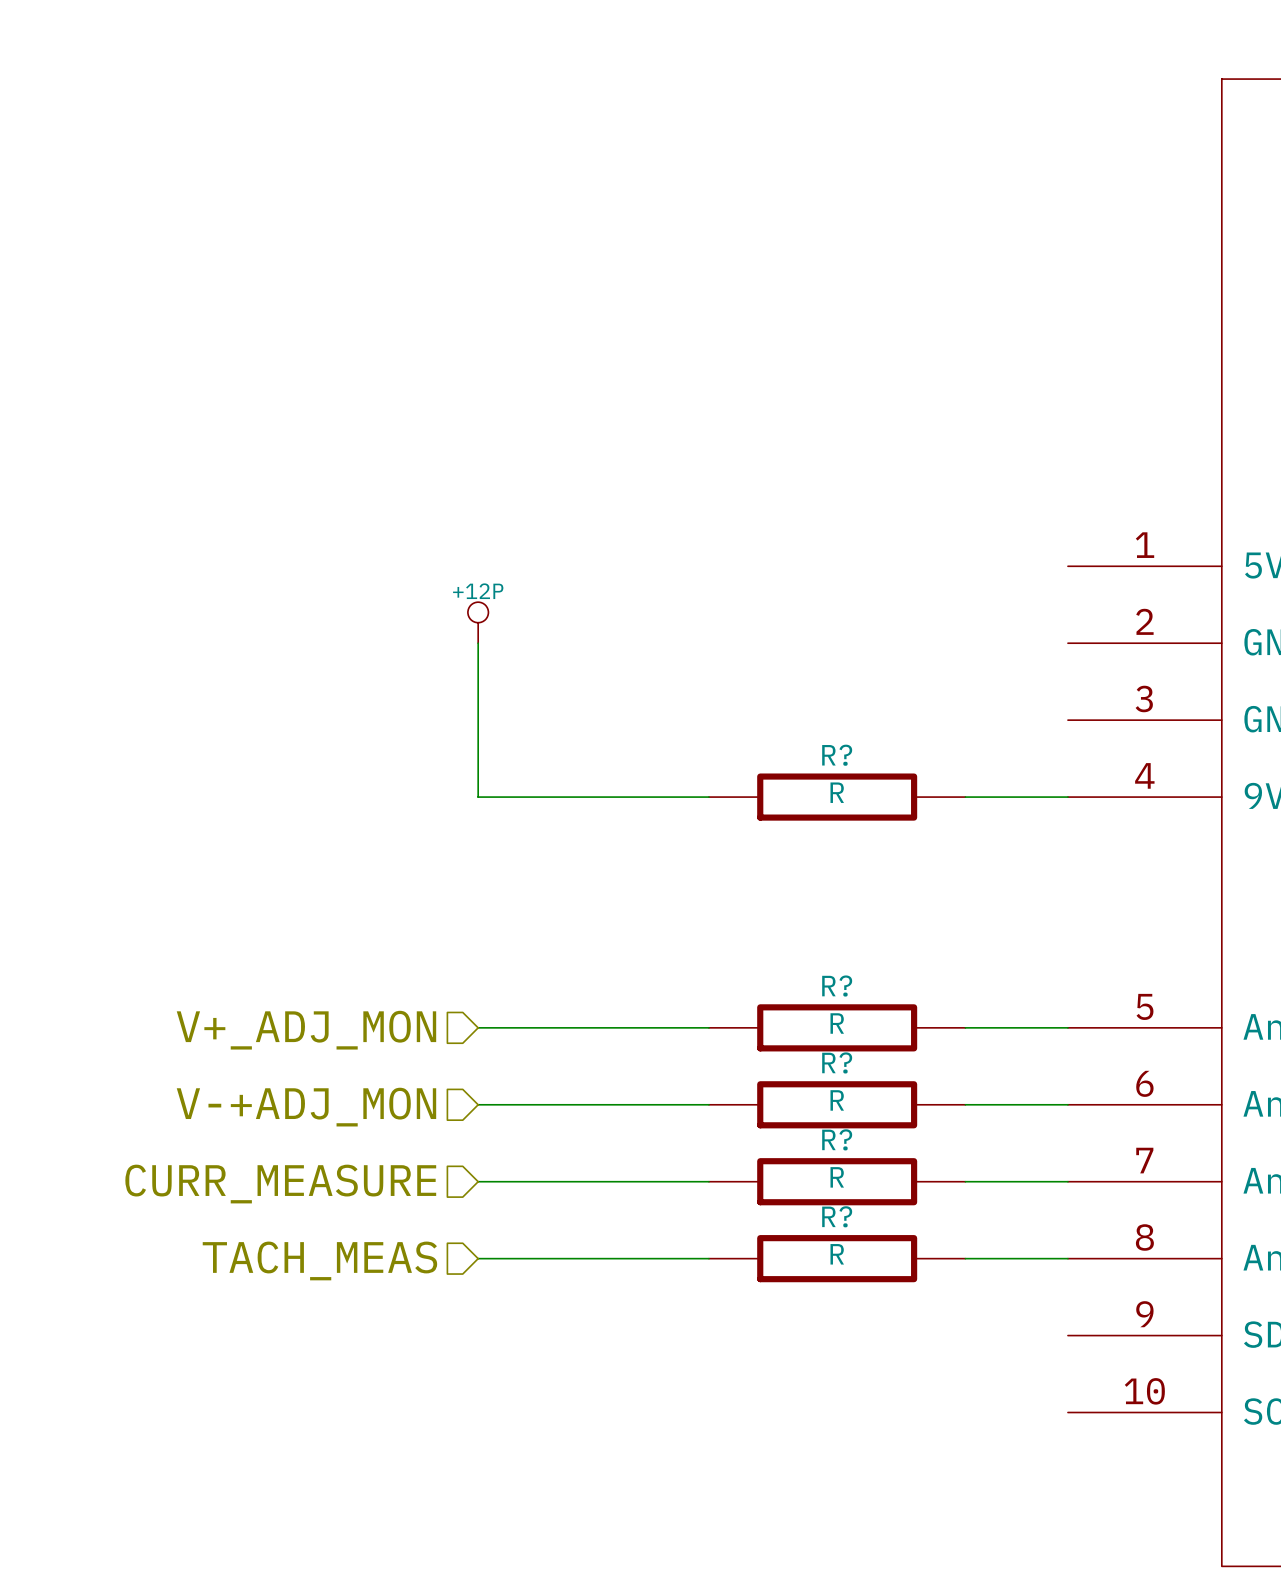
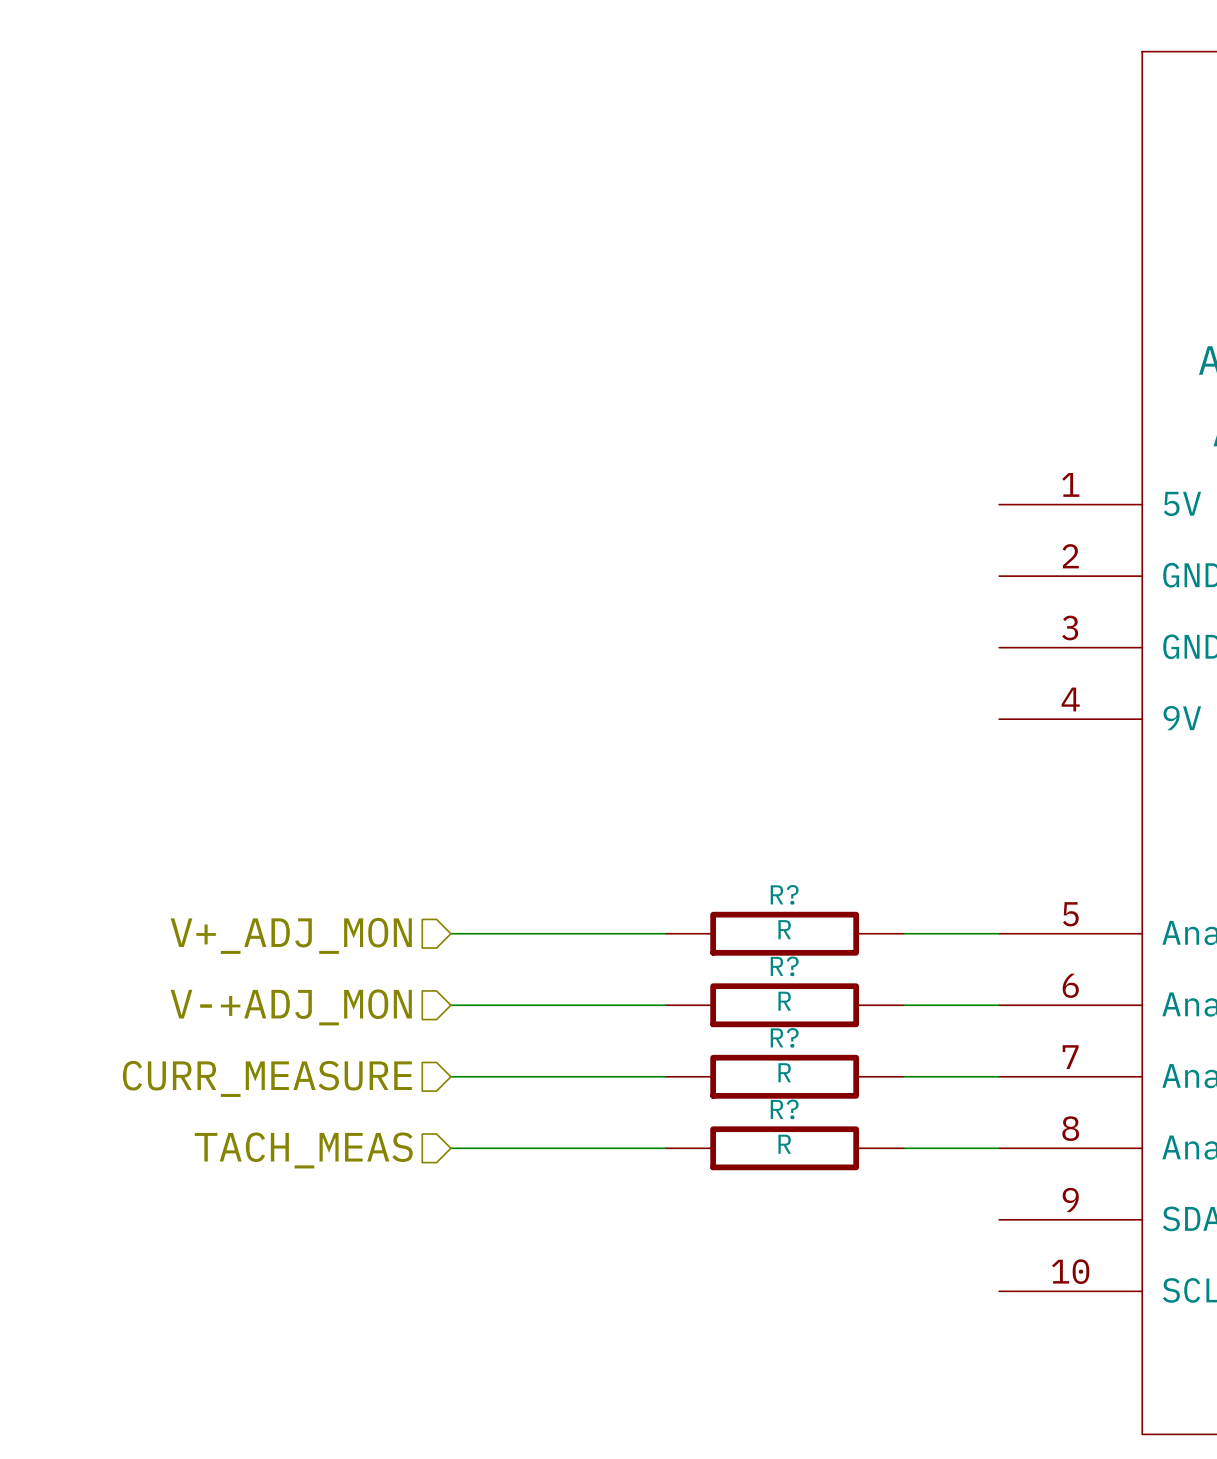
power symbol: +12P (478, 622) -> none
wire: (478, 643) (478, 797) (708, 797) -> none
R?: R (837, 797) -> none
wire: (965, 797) (1067, 797) -> none

